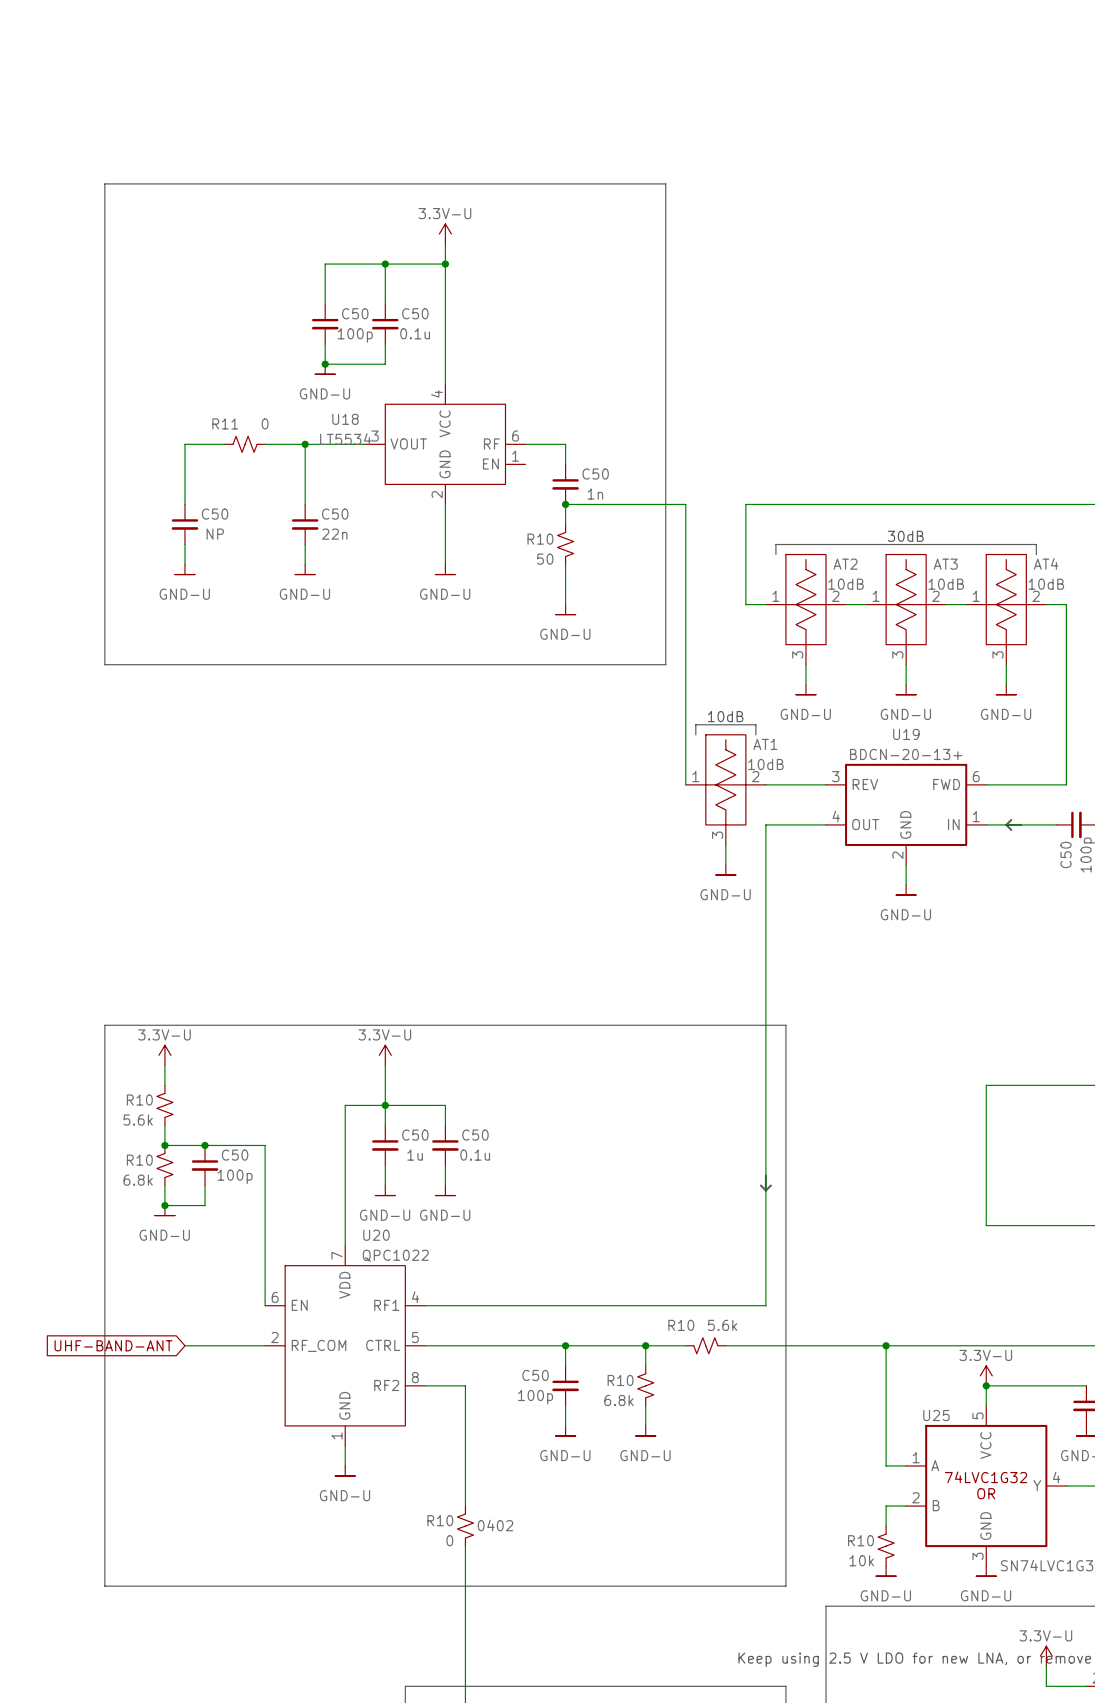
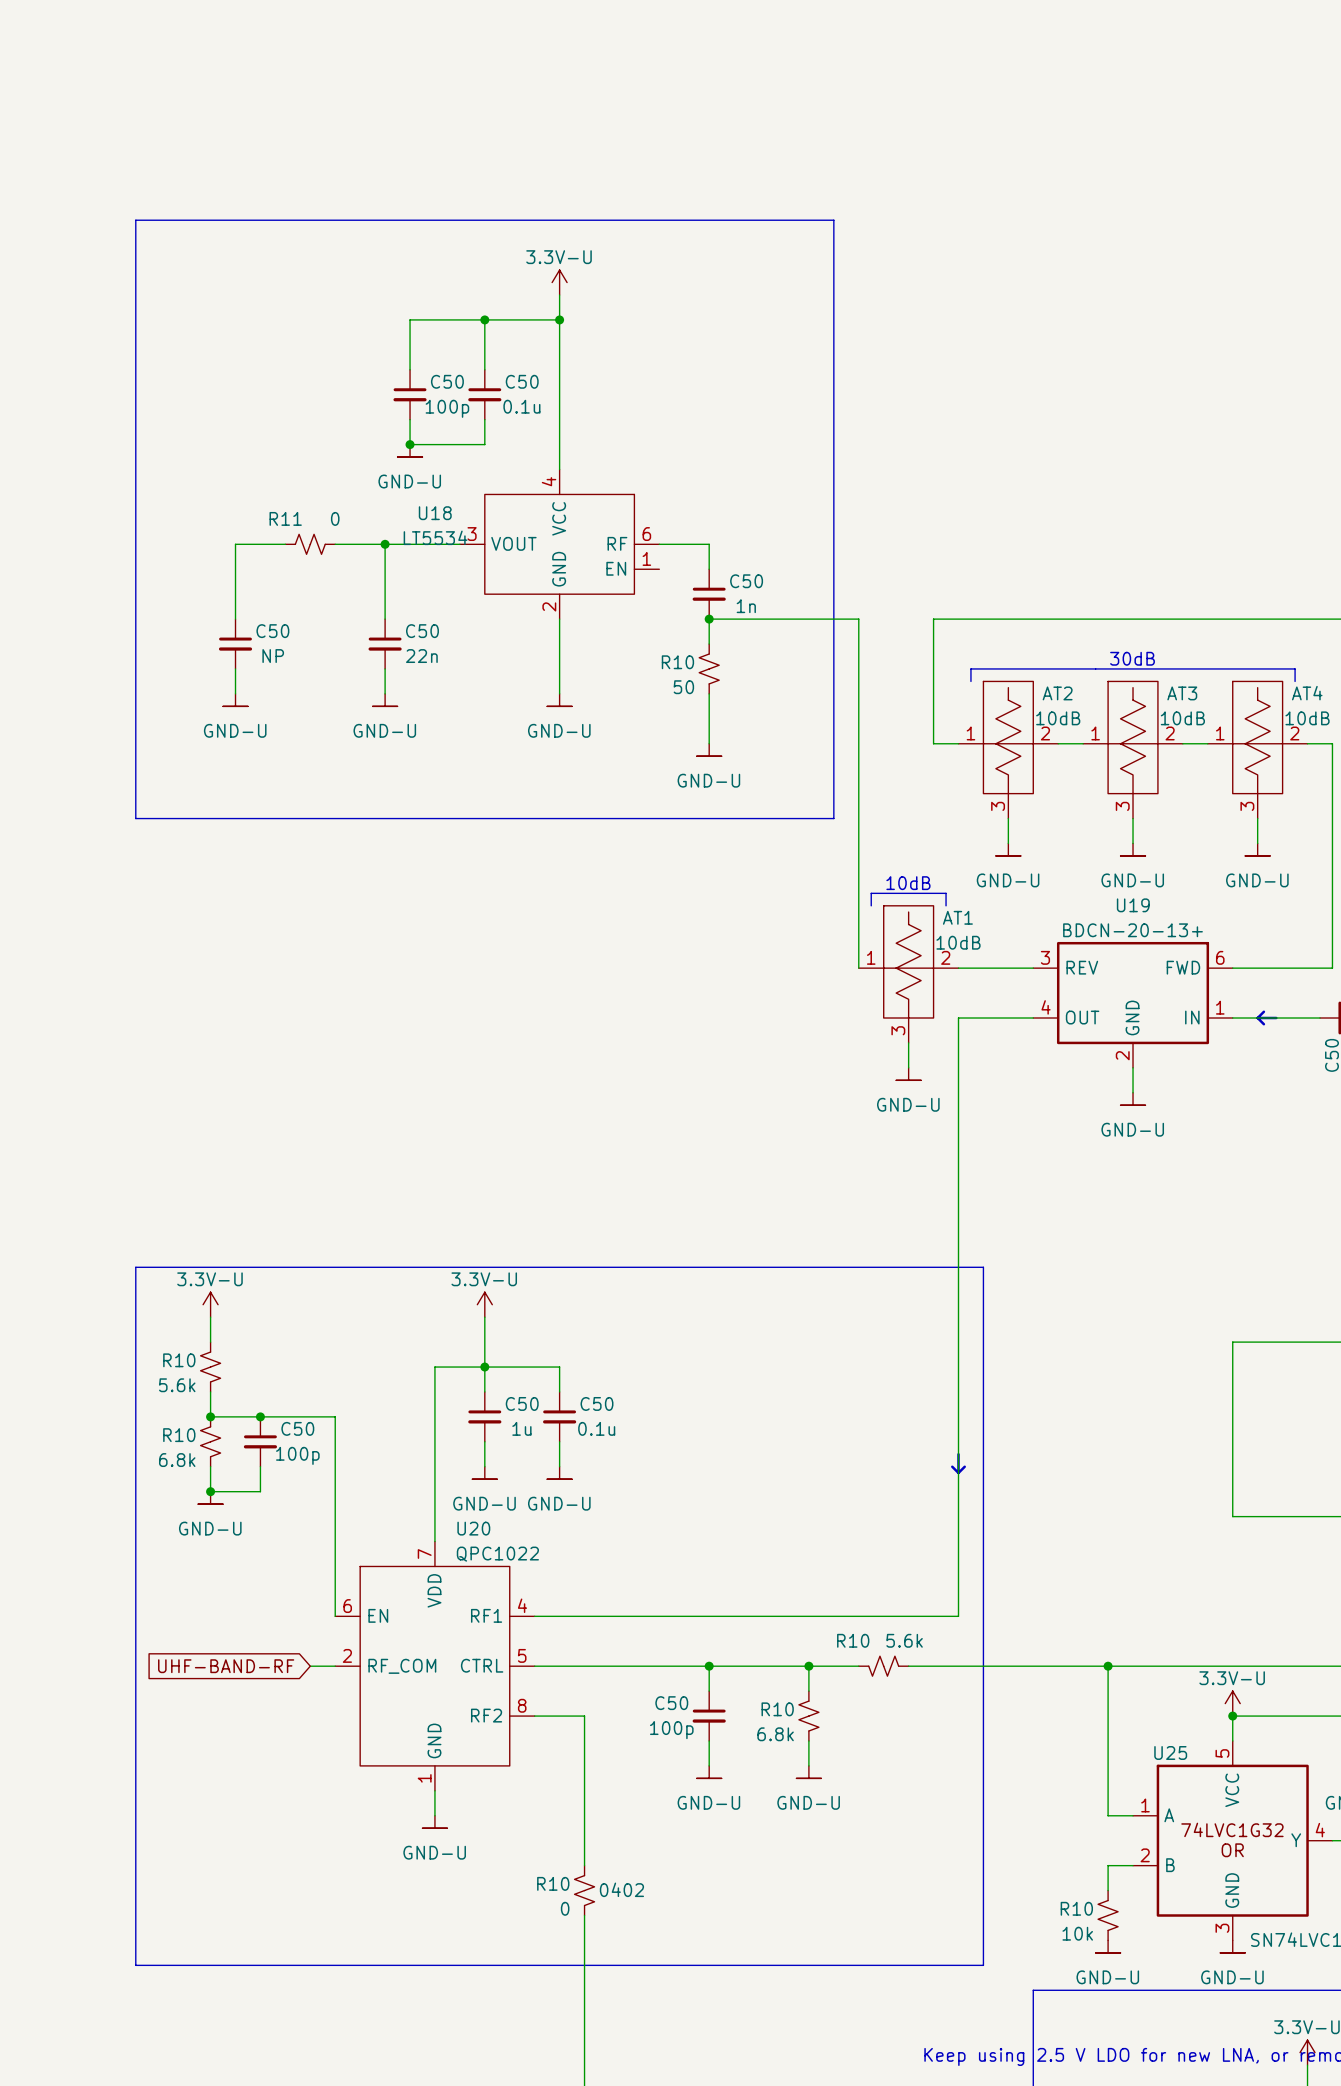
global label: UHF-BAND-ANT (113, 1345) -> UHF-BAND-RF (226, 1666)
wire: (184, 1345) (245, 1345) -> none

